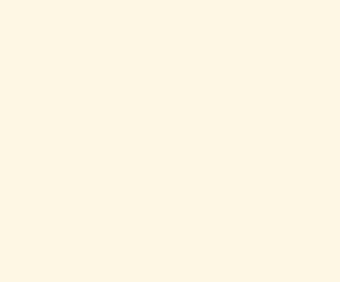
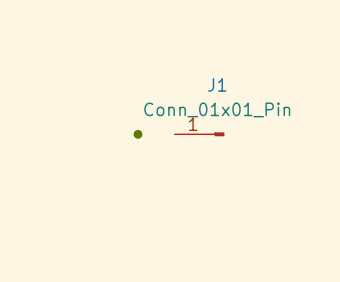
junction: none -> (138, 134)
J1: none -> Conn_01x01_Pin (199, 134)

